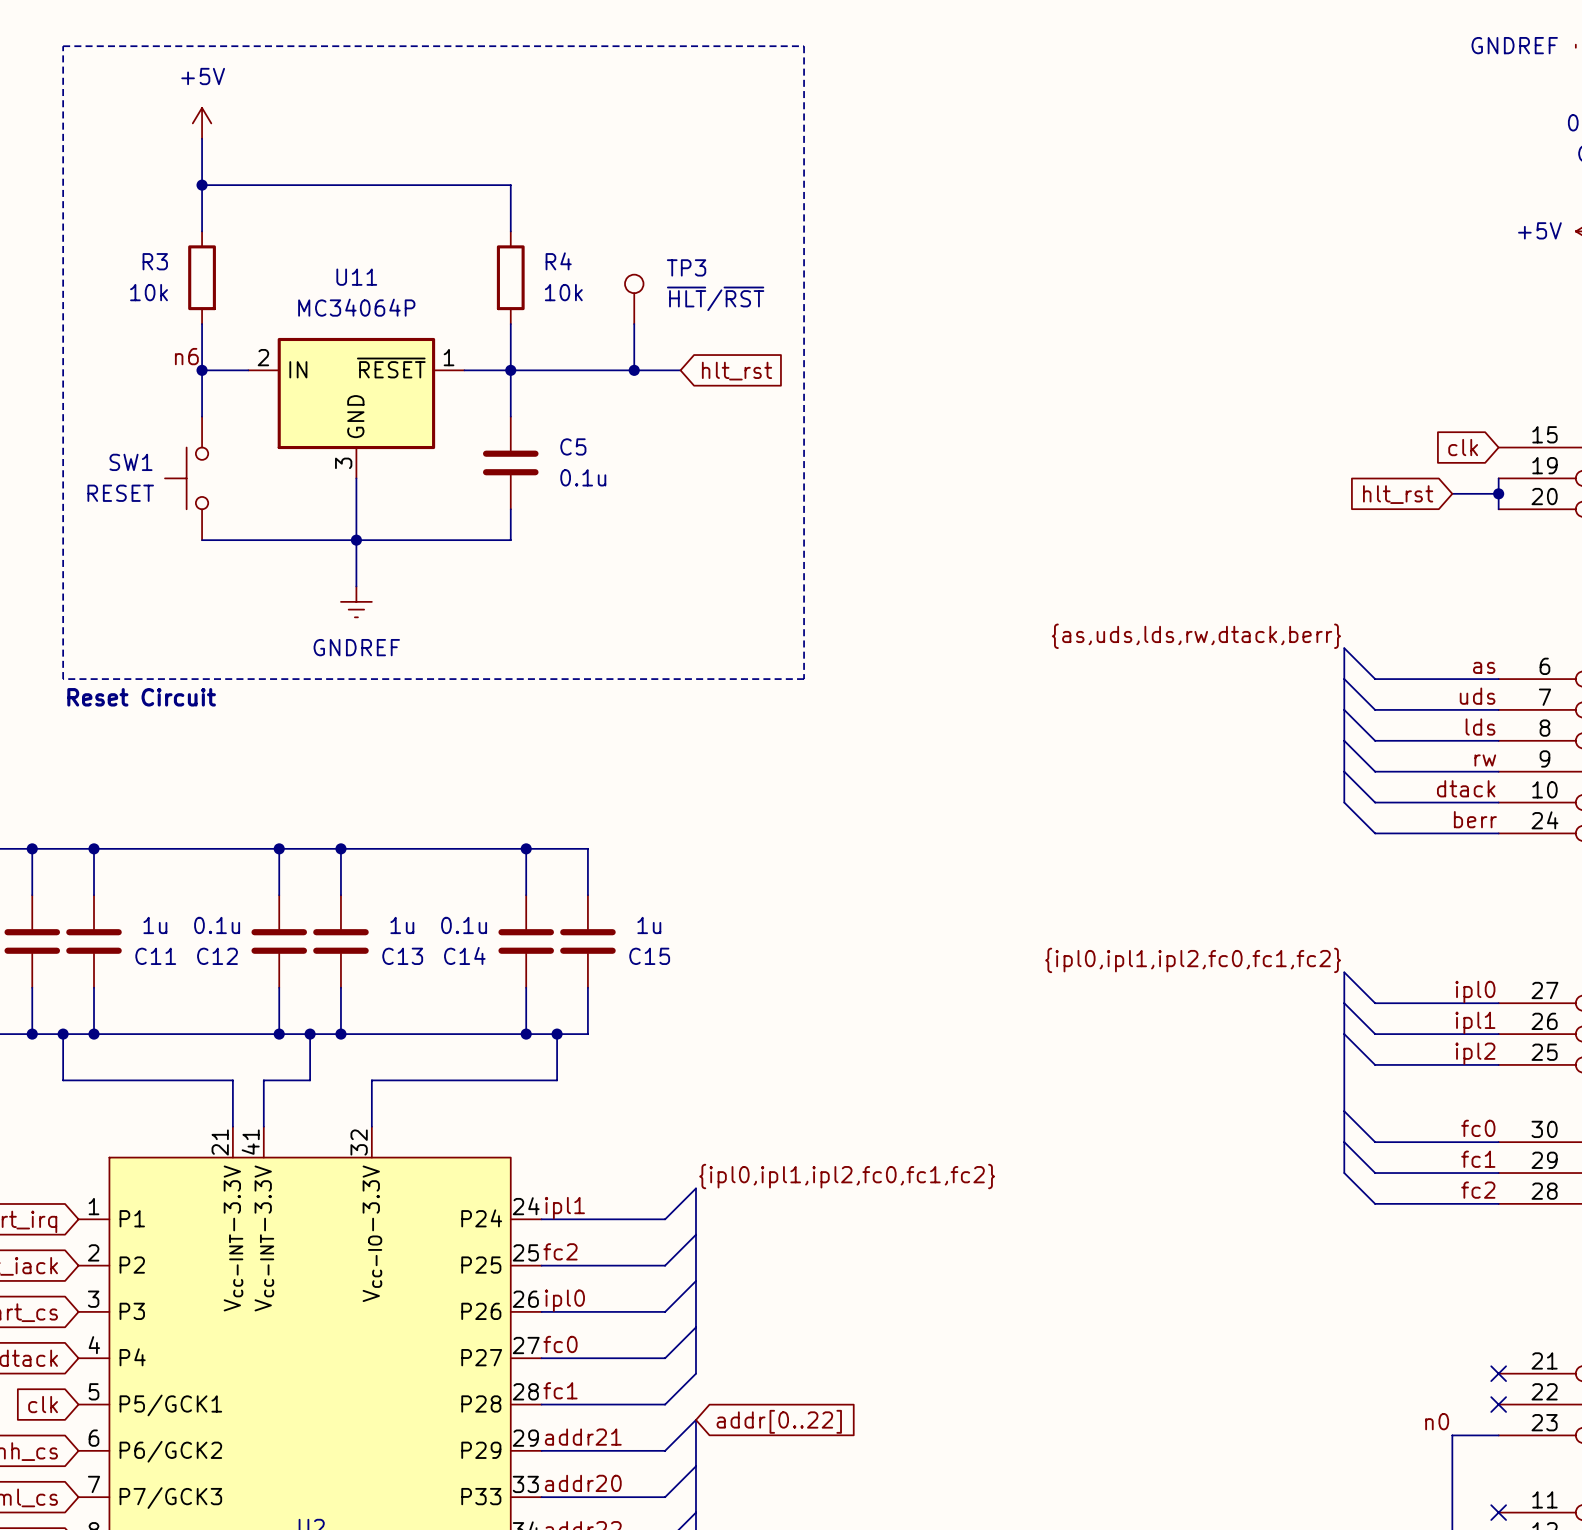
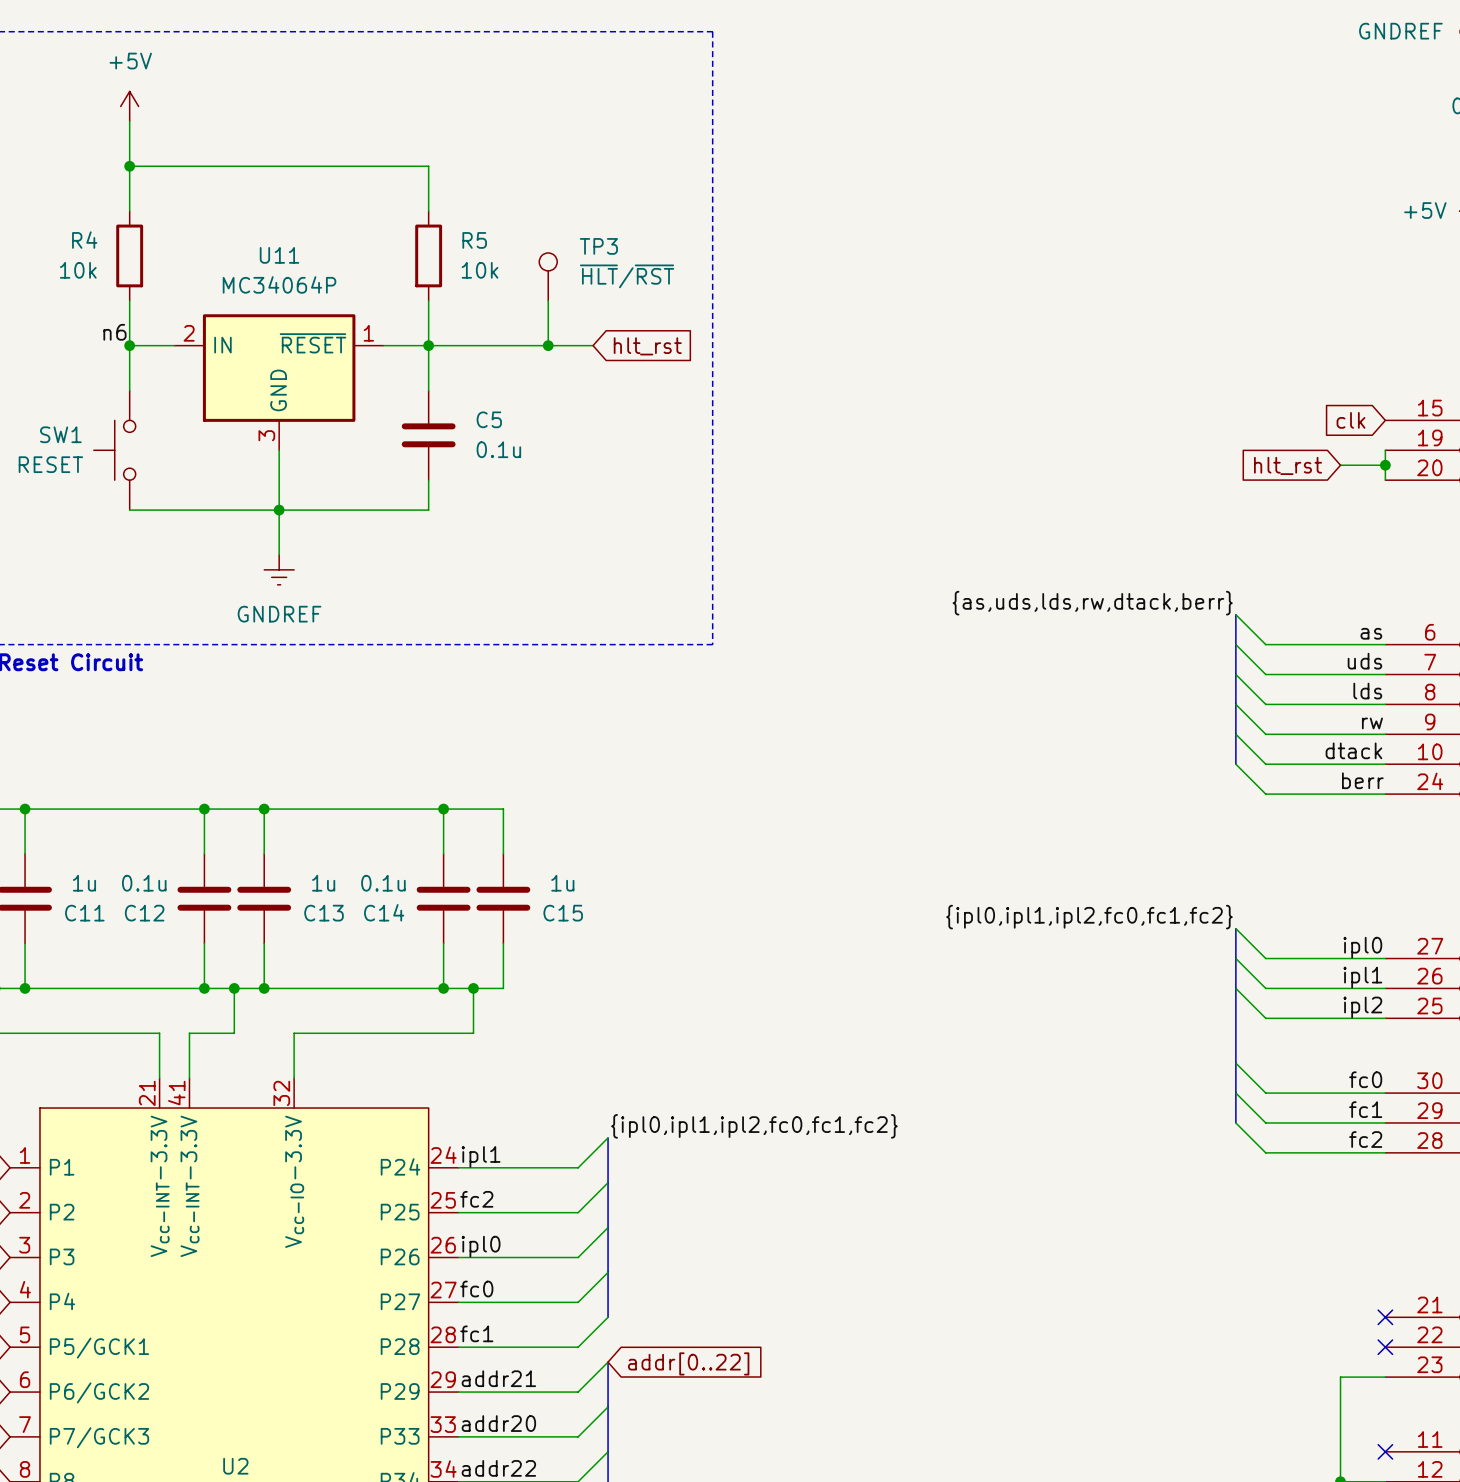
R3 name: R3 (155, 261) -> R4 (84, 240)
R4 name: R4 (558, 261) -> R5 (474, 240)
label: n0 (1437, 1421) -> none

